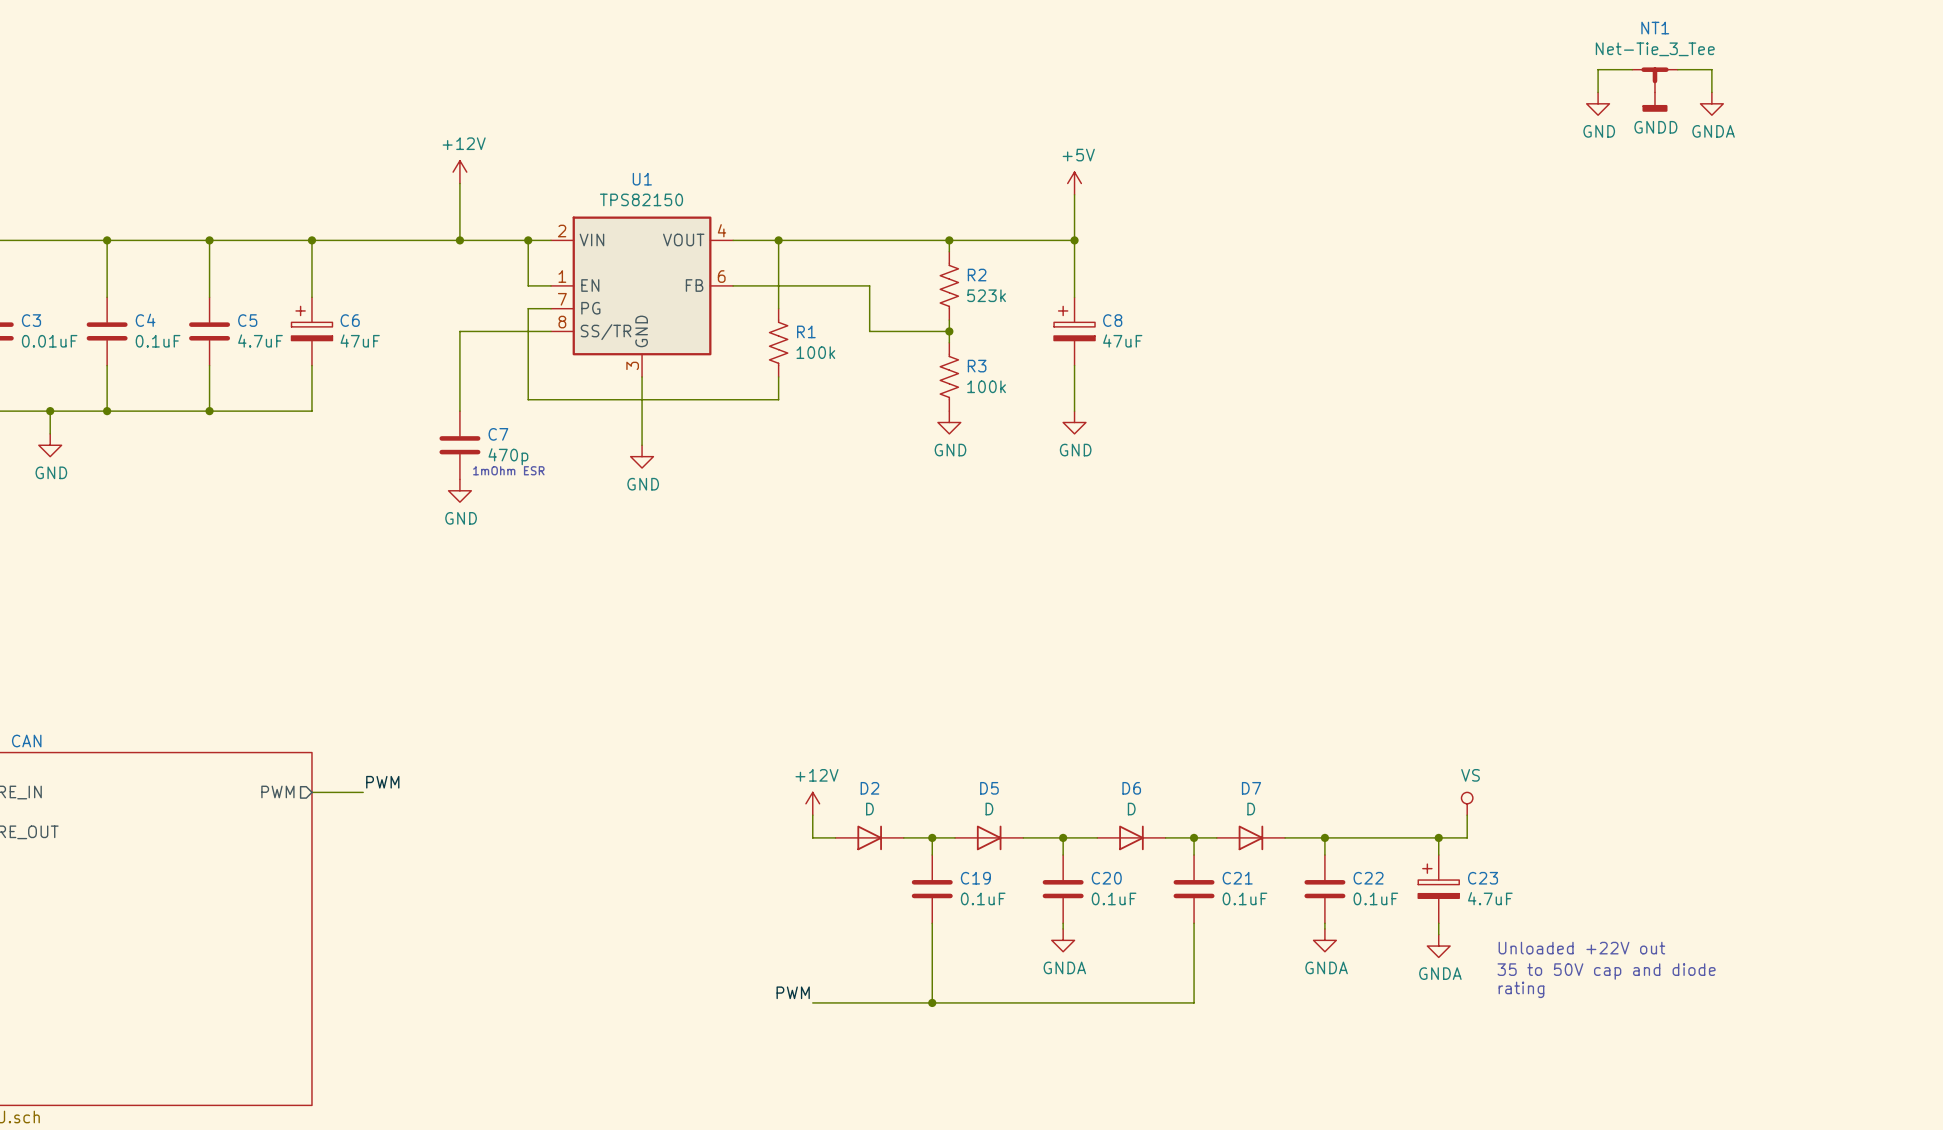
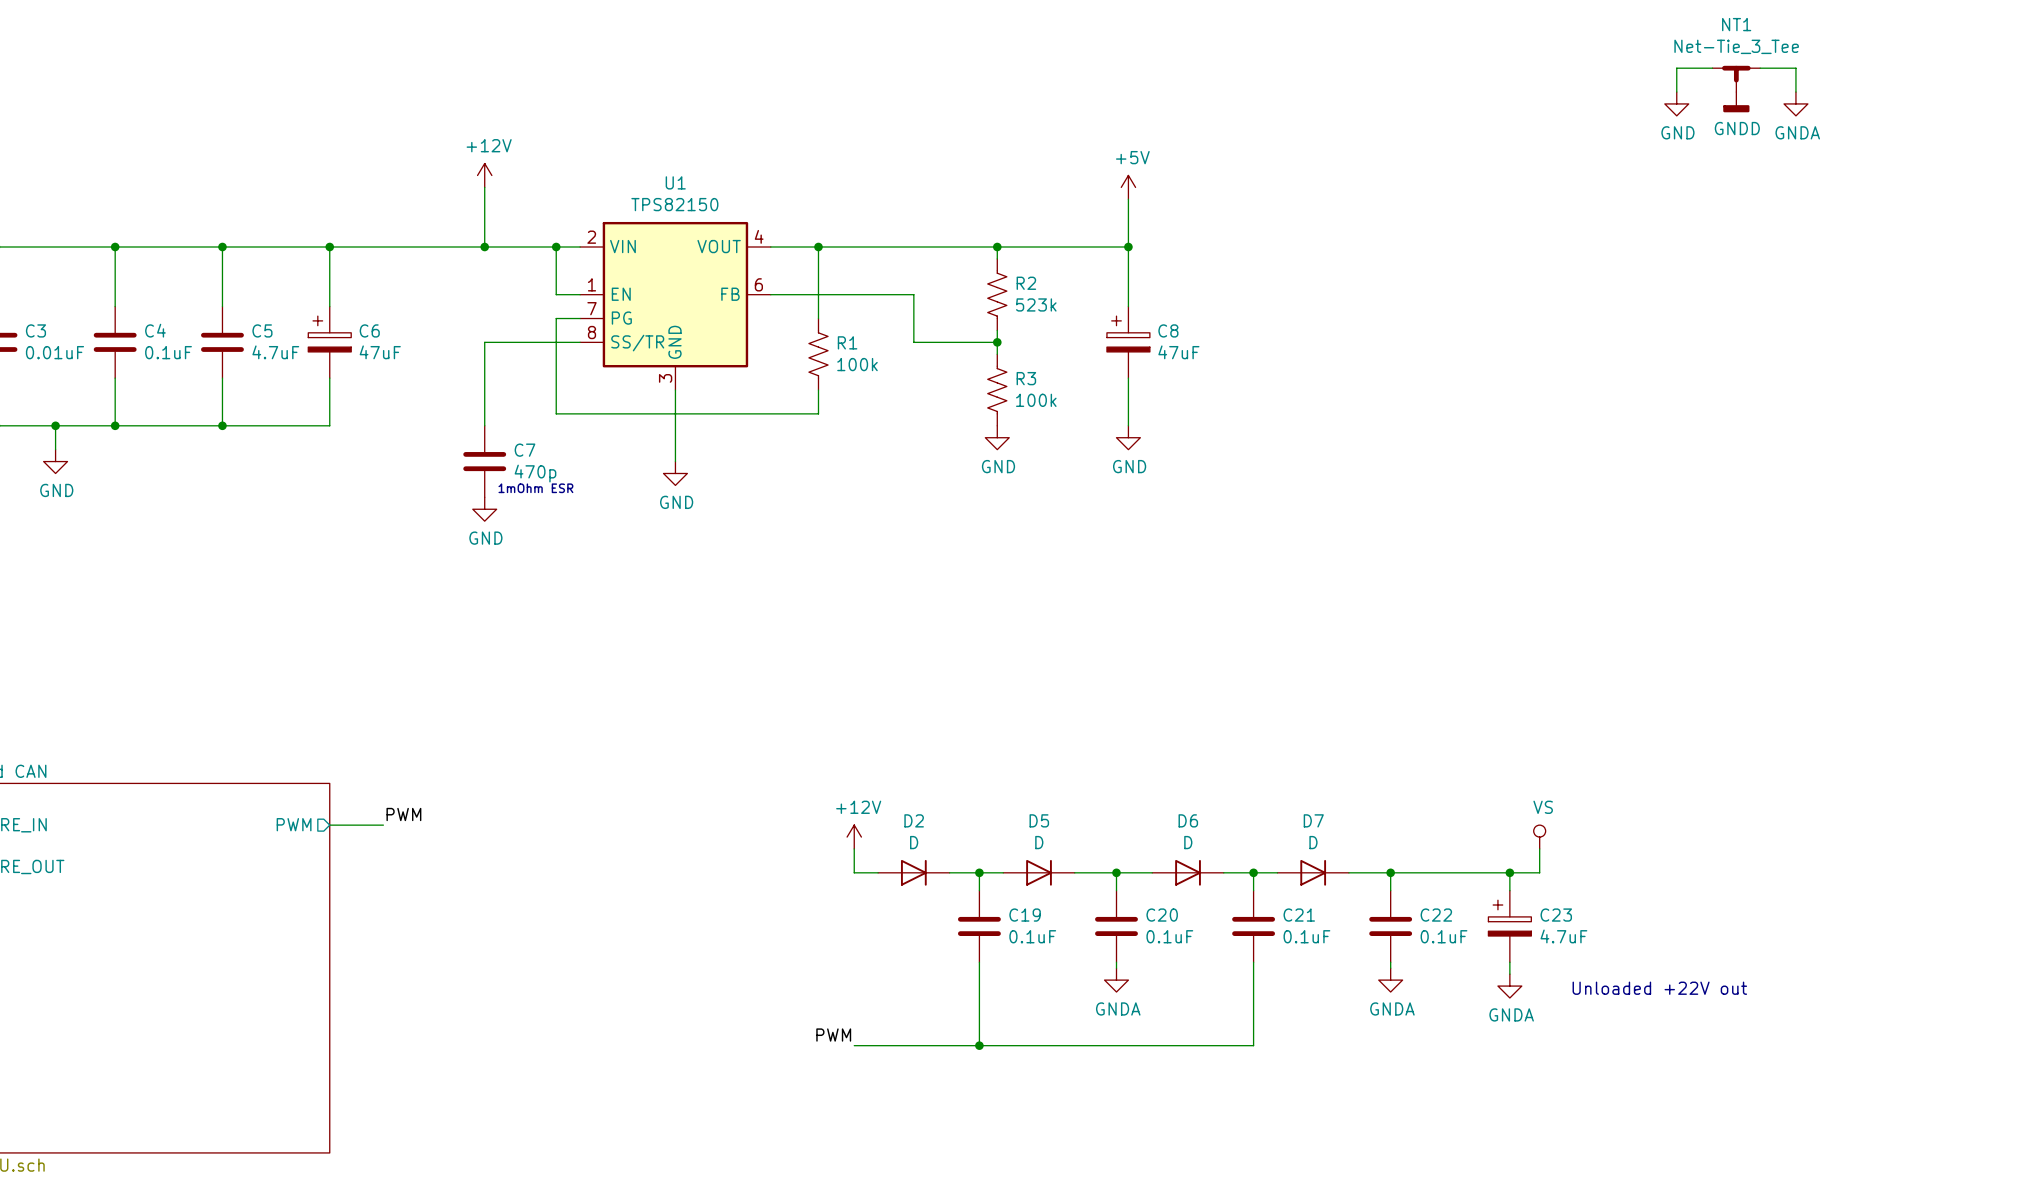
text: 35 to 50V cap and diode (1606, 971) -> none
text: rating (1521, 989) -> none

